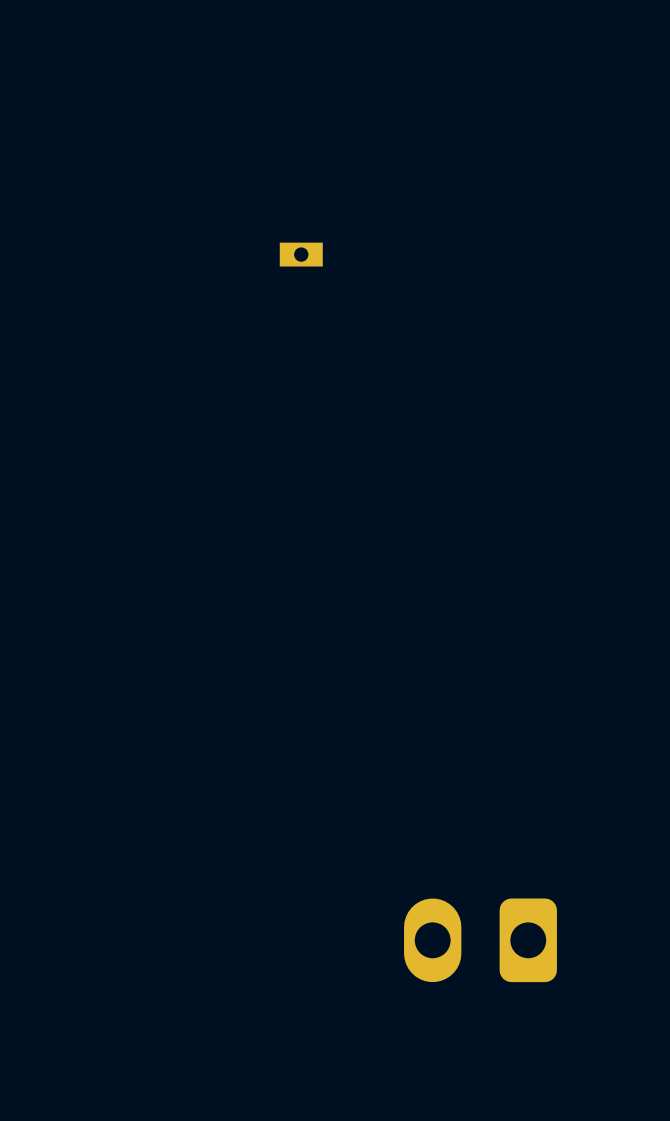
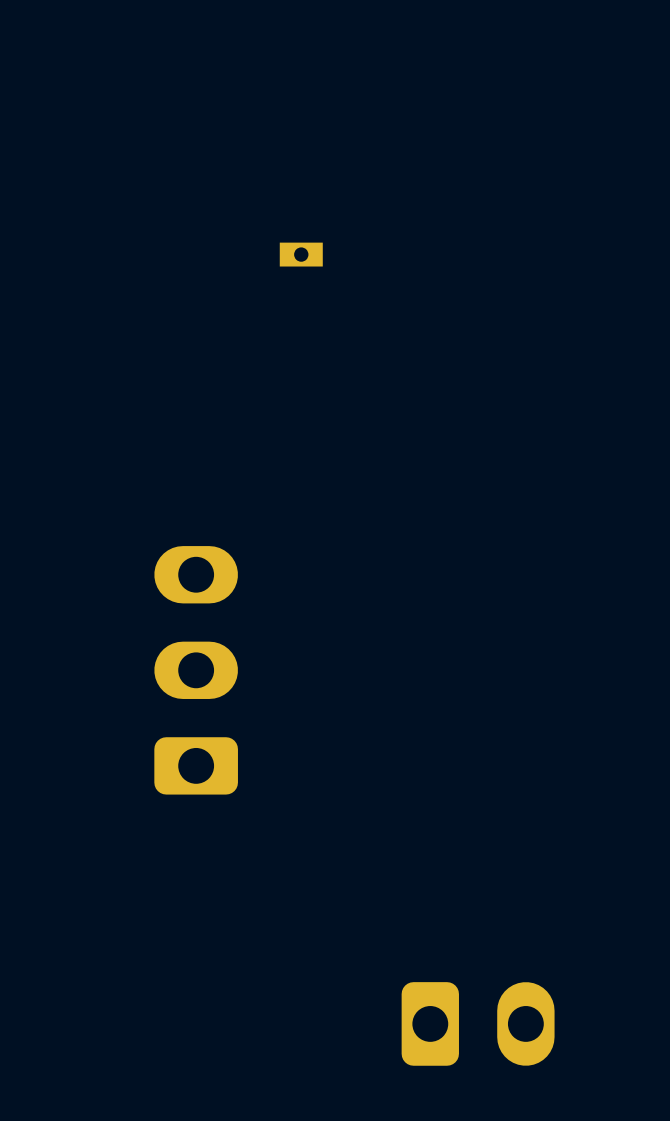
part: none -> (196, 670)
part rotation: 0° (480, 940) -> 180° (478, 1023)

